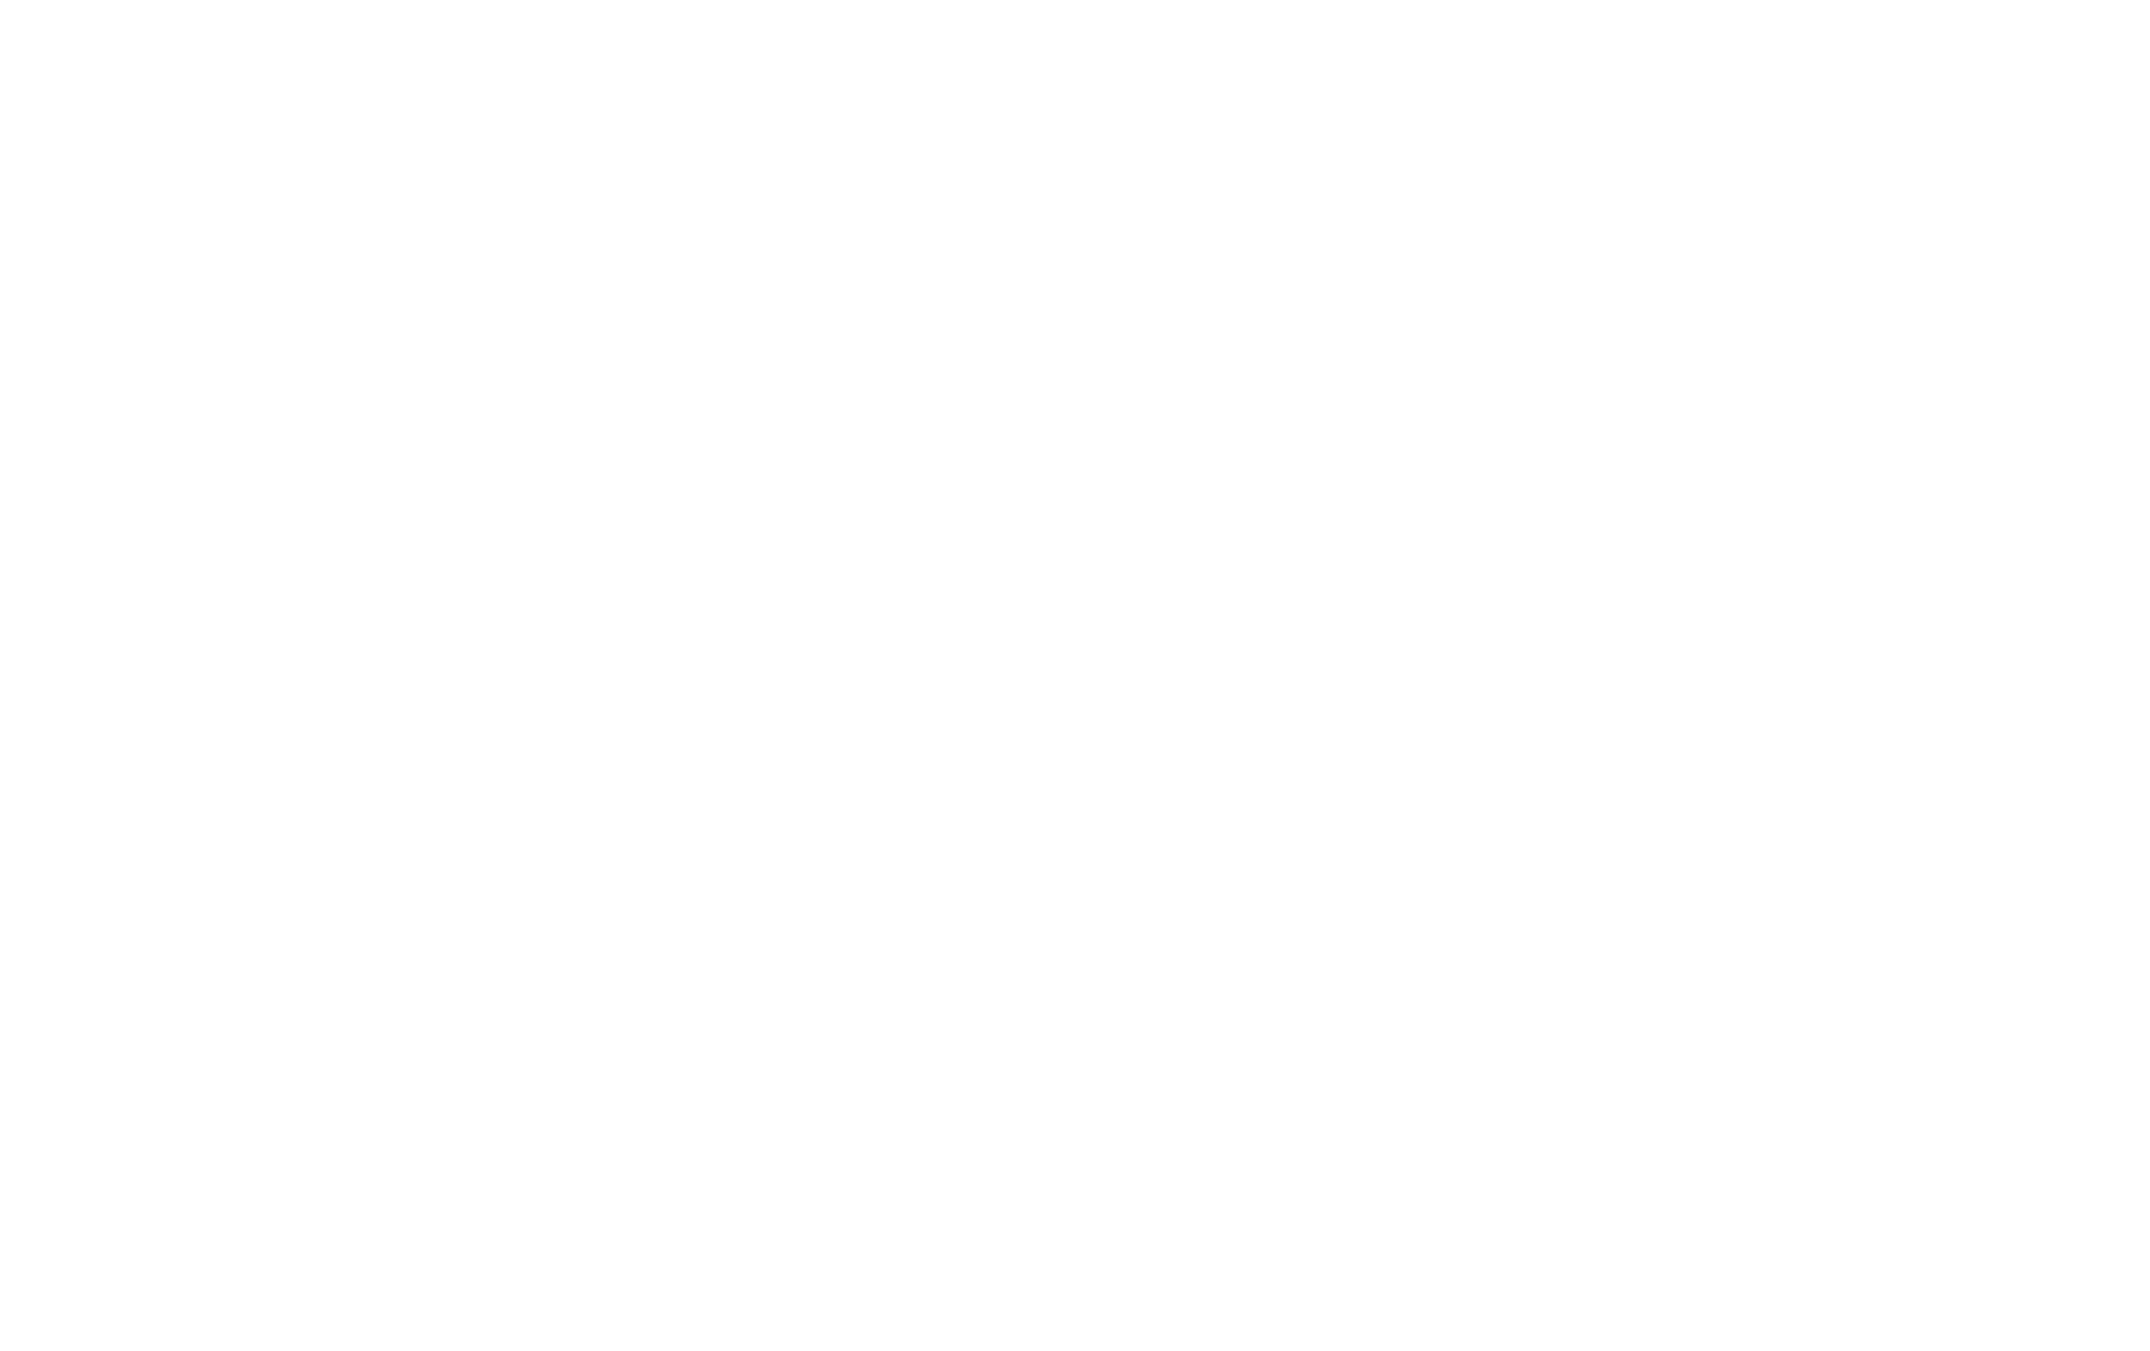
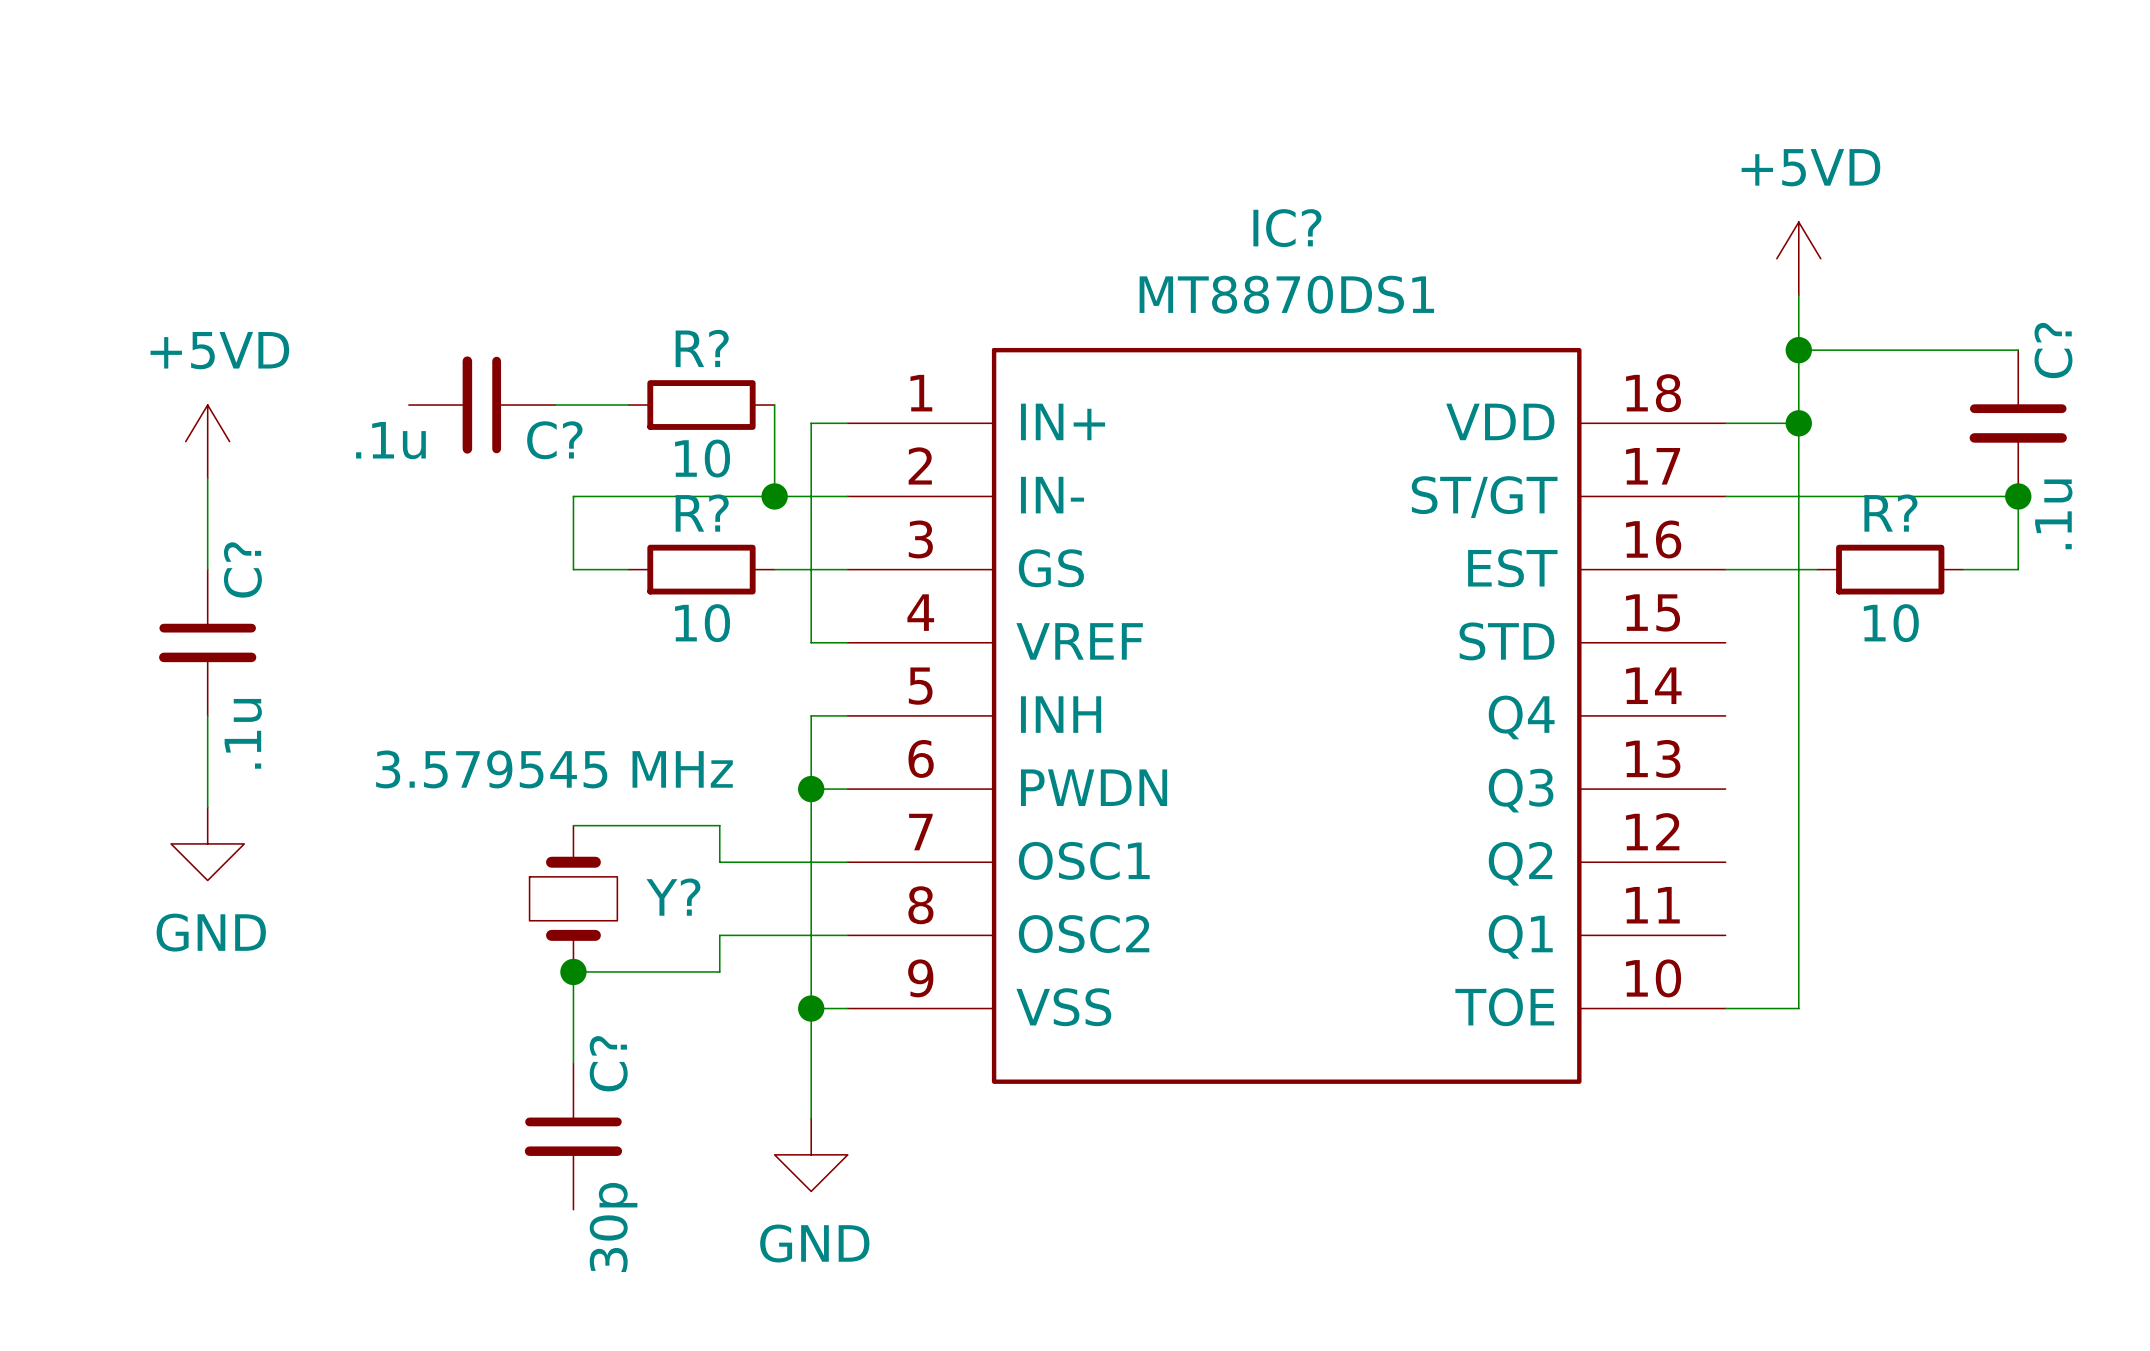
power symbol: none -> +5VD (1798, 258)
wire: none -> (1798, 295) (1798, 1008) (1725, 1008)
wire: none -> (1798, 350) (2018, 350)
junction: none -> (1798, 350)
C?: none -> .1u (482, 405)
wire: none -> (555, 405) (628, 405)
R?: none -> 10 (701, 405)
wire: none -> (774, 405) (774, 496)
wire: none -> (847, 423) (811, 423) (811, 642) (847, 642)
wire: none -> (1725, 423) (1798, 423)
junction: none -> (1798, 423)
C?: none -> .1u (2018, 423)
power symbol: none -> +5VD (207, 441)
wire: none -> (207, 478) (207, 569)
junction: none -> (774, 496)
wire: none -> (847, 496) (573, 496) (573, 569) (628, 569)
wire: none -> (1725, 496) (2018, 496) (2018, 569) (1963, 569)
junction: none -> (2018, 496)
R?: none -> 10 (701, 569)
wire: none -> (774, 569) (847, 569)
wire: none -> (1725, 569) (1817, 569)
R?: none -> 10 (1890, 569)
C?: none -> .1u (207, 642)
wire: none -> (207, 715) (207, 807)
wire: none -> (847, 715) (811, 715) (811, 1118)
IC?: none -> MT8870DS1 (1286, 715)
wire: none -> (811, 789) (847, 789)
junction: none -> (811, 789)
wire: none -> (573, 825) (719, 825) (719, 862) (847, 862)
power symbol: none -> GND (207, 843)
Y?: none -> 3.579545 MHz (573, 898)
wire: none -> (847, 935) (719, 935) (719, 971) (573, 971) (573, 1063)
junction: none -> (573, 971)
wire: none -> (811, 1008) (847, 1008)
junction: none -> (811, 1008)
C?: none -> 30p (573, 1136)
power symbol: none -> GND (811, 1154)

